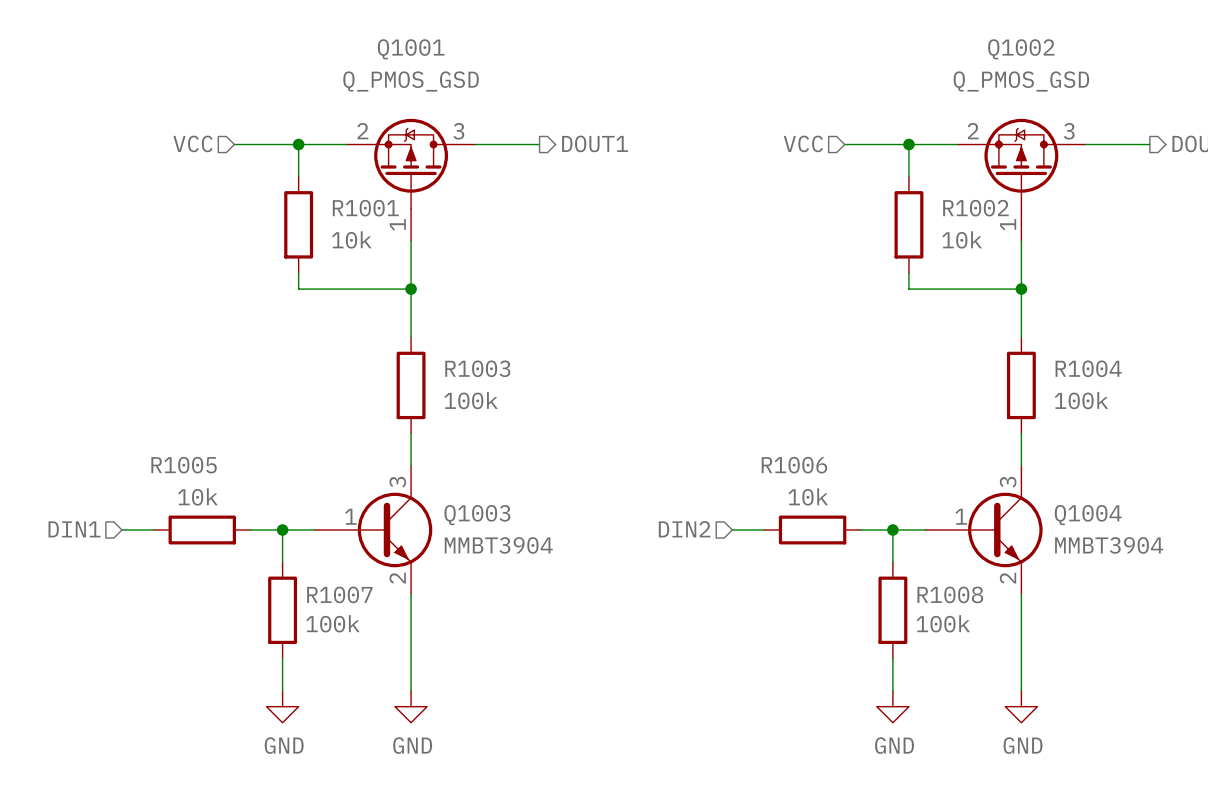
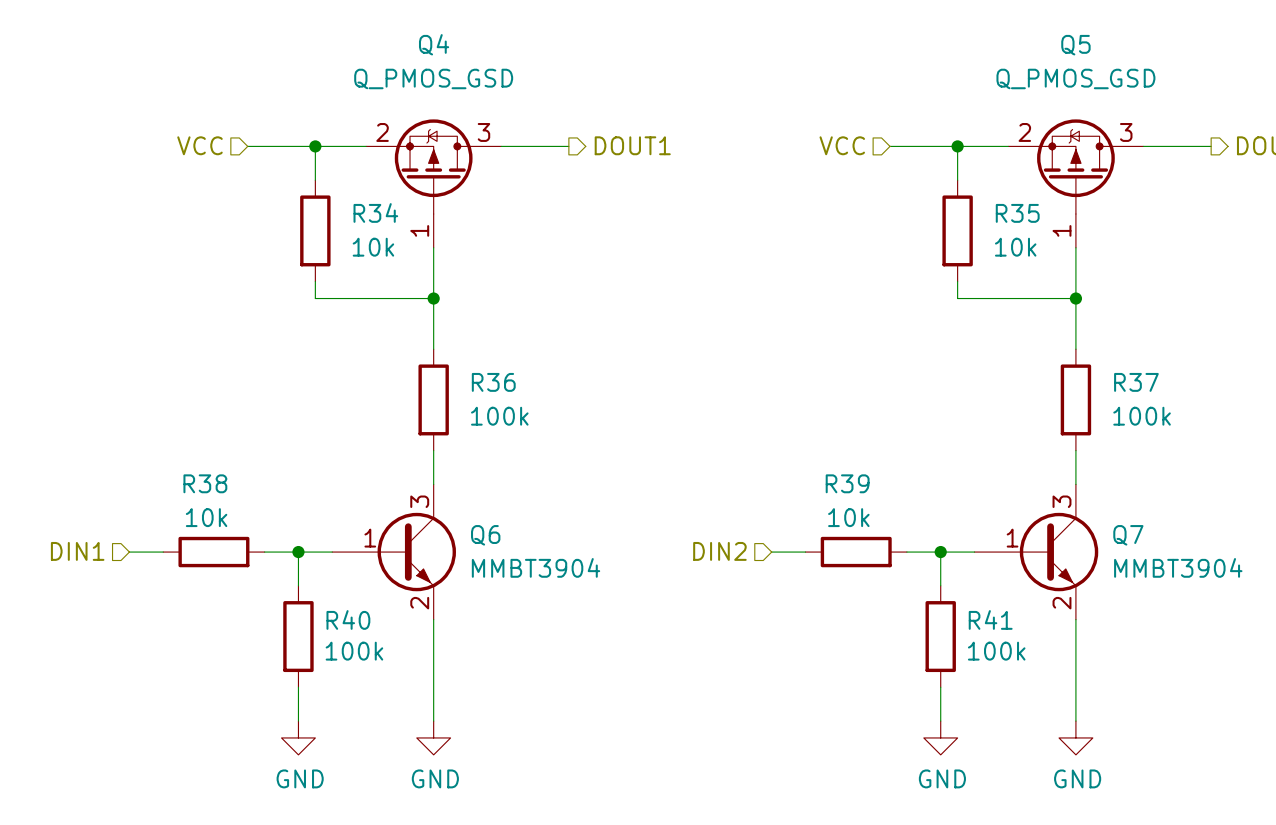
Q1001 name: Q1001 (411, 49) -> Q4 (434, 44)
Q1002 name: Q1002 (1021, 49) -> Q5 (1075, 45)
R1001 name: R1001 (365, 208) -> R34 (375, 212)
R1002 name: R1002 (975, 208) -> R35 (1017, 213)
R1003 name: R1003 (477, 368) -> R36 (493, 382)
R1004 name: R1004 (1088, 368) -> R37 (1136, 382)
R1005 name: R1005 (184, 465) -> R38 (205, 483)
R1006 name: R1006 (794, 465) -> R39 (847, 483)
Q1003 name: Q1003 (477, 515) -> Q6 (485, 535)
Q1004 name: Q1004 (1088, 515) -> Q7 (1128, 535)
R1007 name: R1007 (339, 594) -> R40 (348, 619)
R1008 name: R1008 (950, 594) -> R41 (990, 619)

